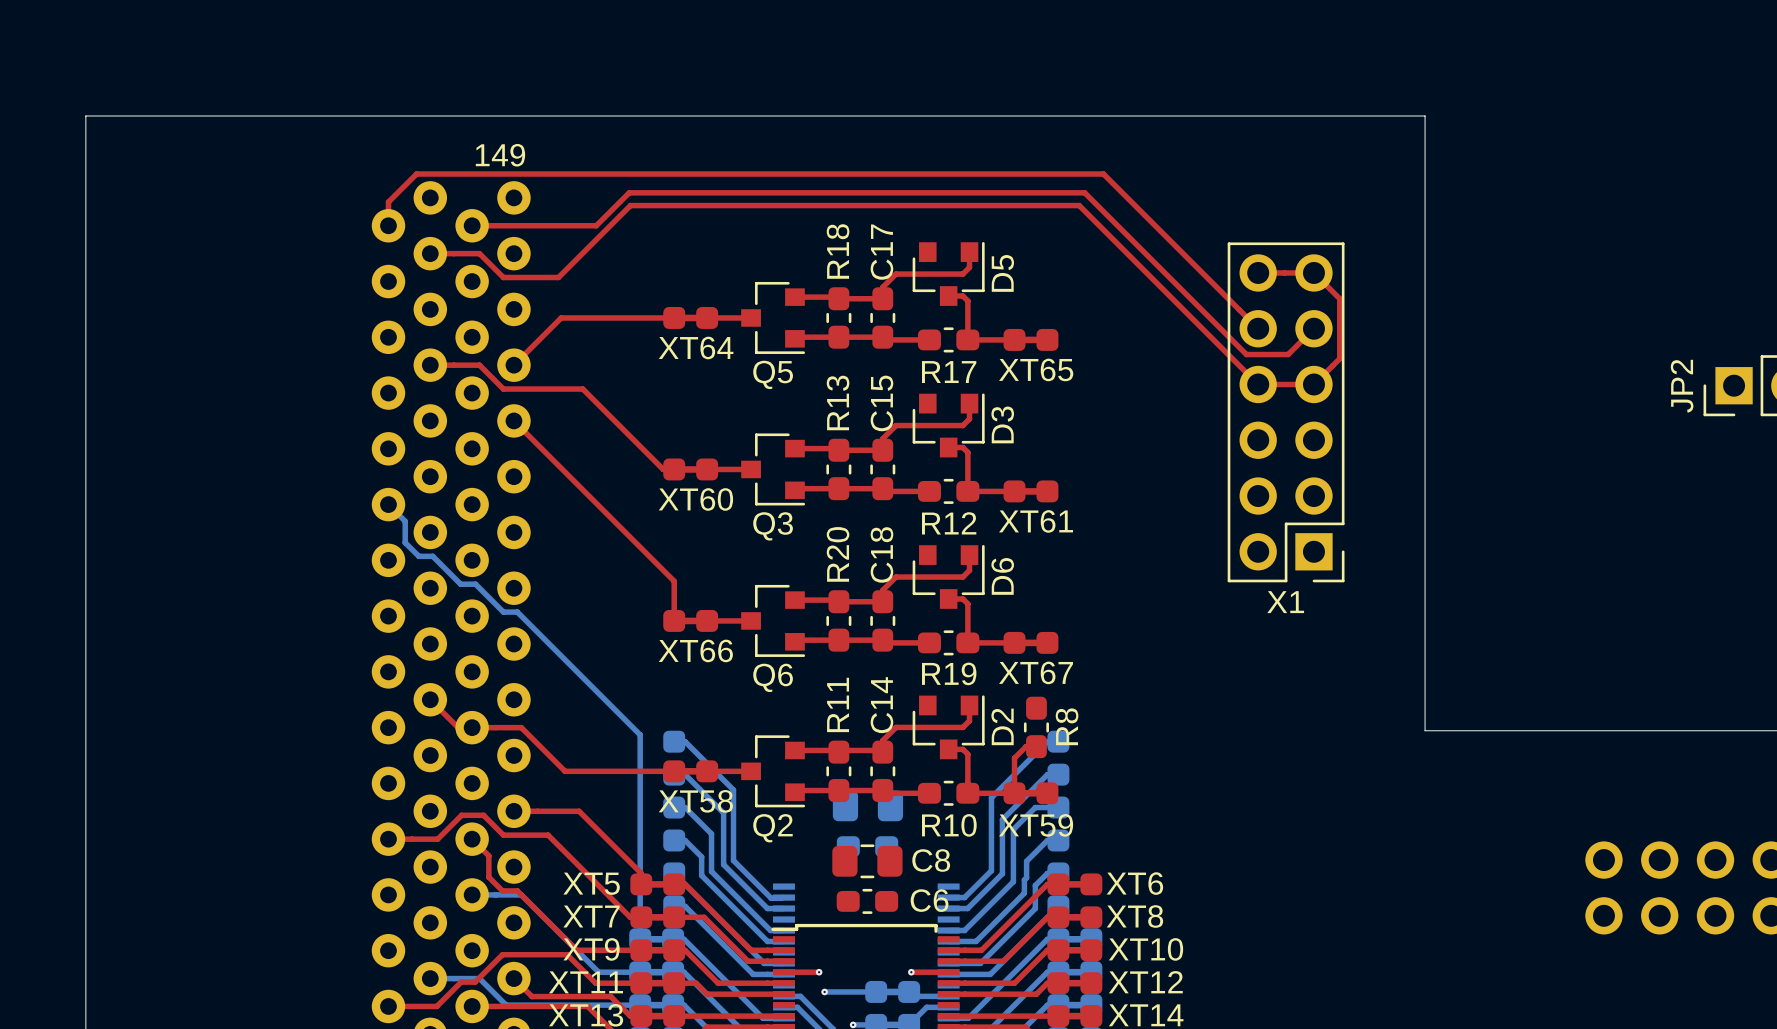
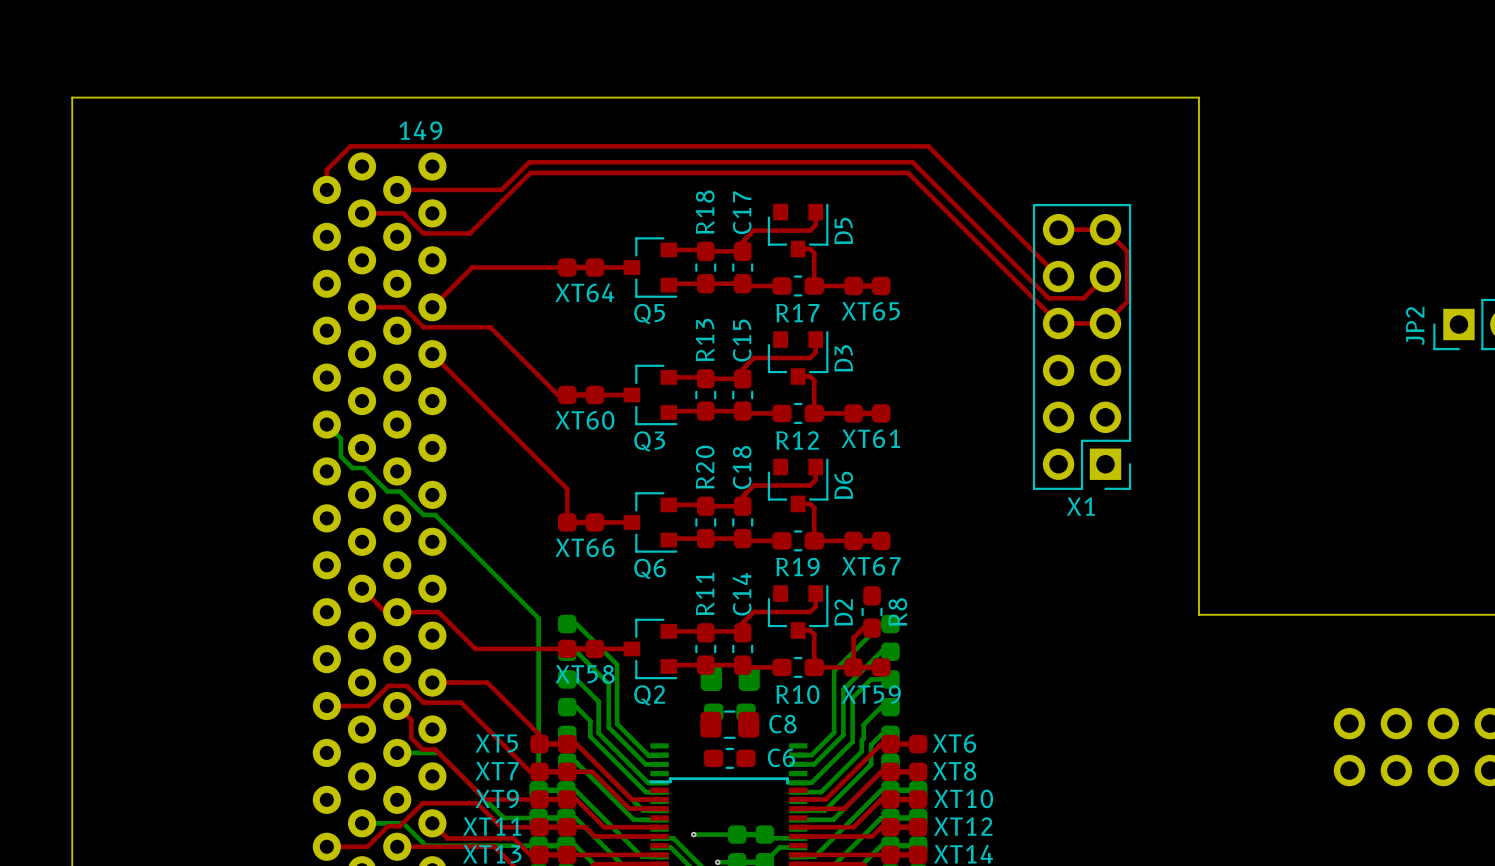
top track: (783, 972) (819, 972) -> none
via: (819, 972) -> none
top track: (911, 972) (948, 972) -> none
via: (911, 972) -> none

